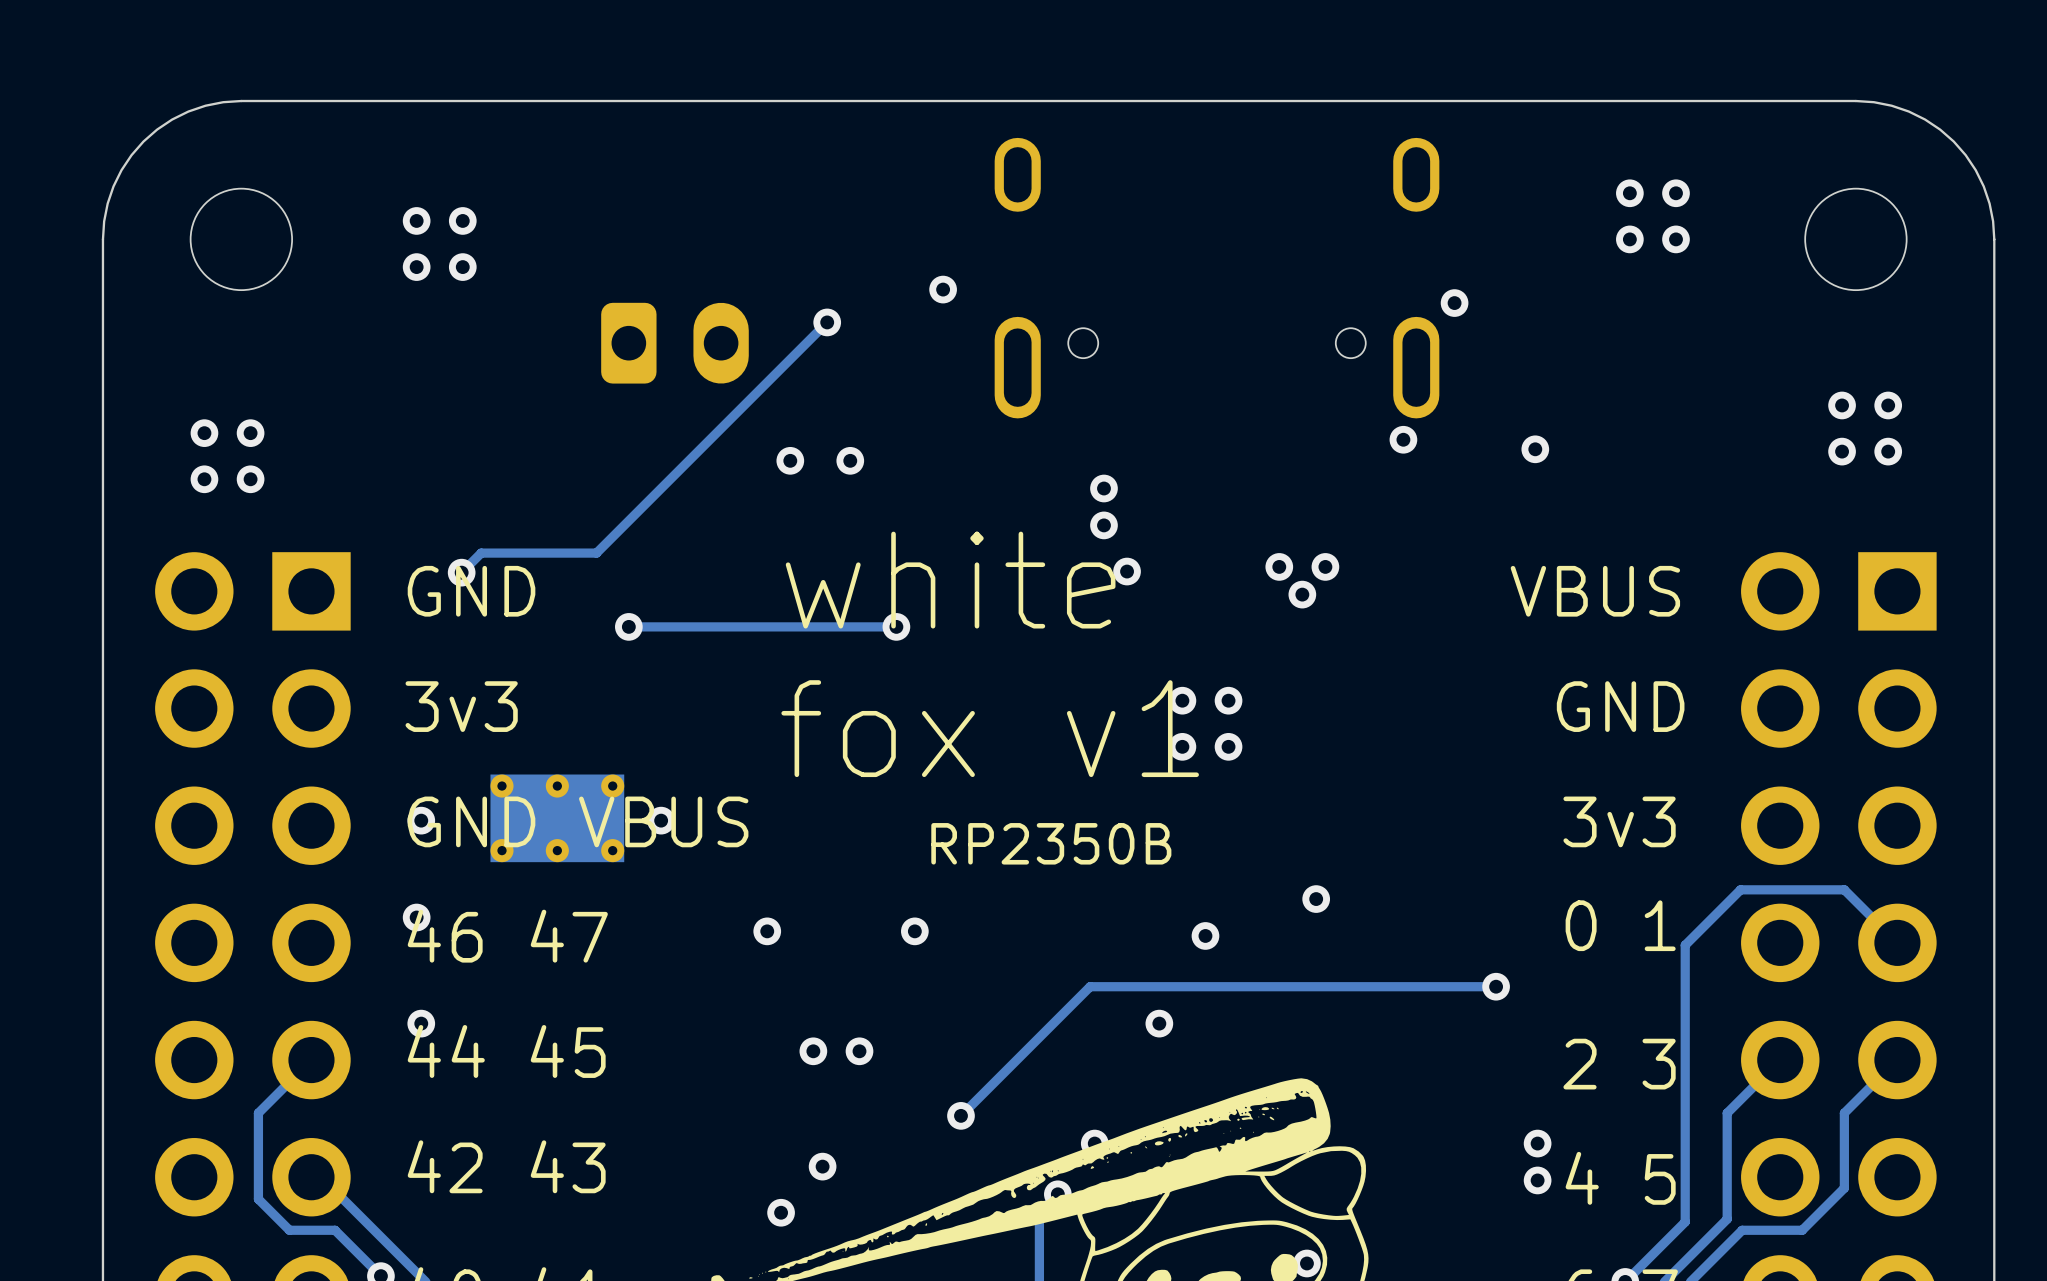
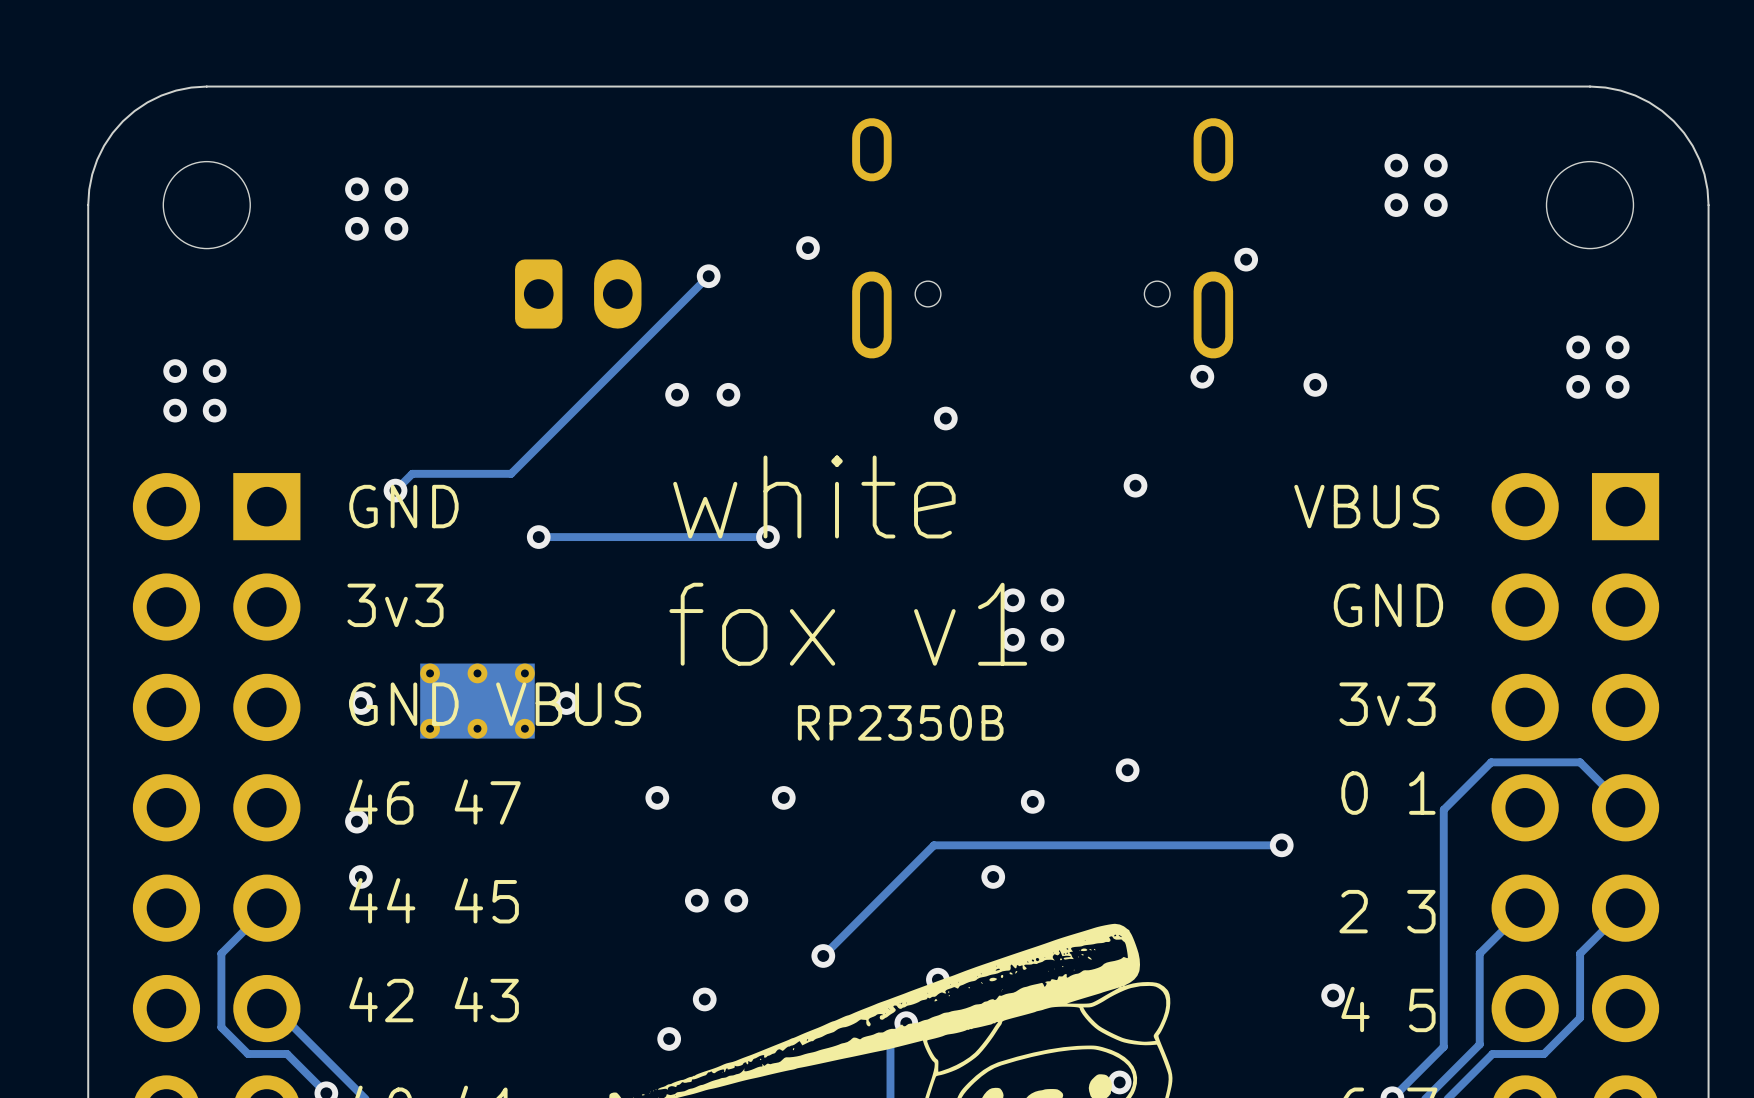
via: (1103, 525) -> none
via: (1279, 566) -> none
via: (1127, 571) -> none
via: (1302, 594) -> none
via position: (416, 917) -> (356, 821)
via: (1537, 1143) -> none
via: none -> (1333, 995)
via: (1537, 1180) -> none

